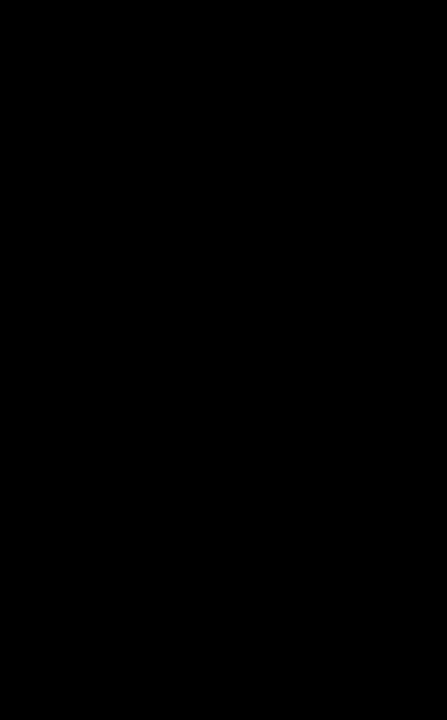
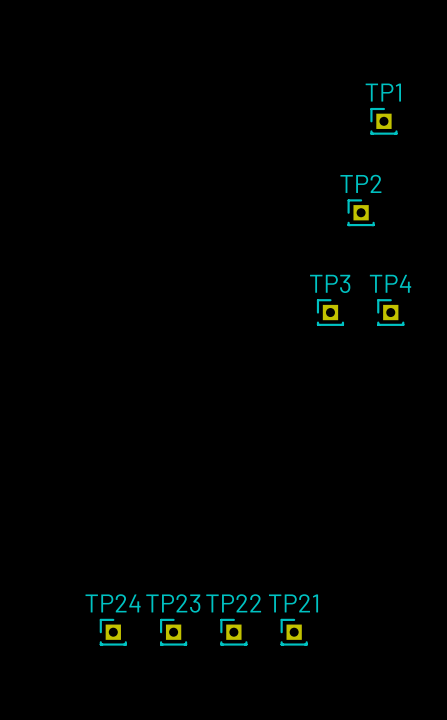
TP1: none -> (383, 121)
TP2: none -> (361, 212)
TP3: none -> (330, 312)
TP4: none -> (390, 312)
TP24: none -> (113, 632)
TP23: none -> (173, 632)
TP22: none -> (233, 632)
TP21: none -> (294, 632)

